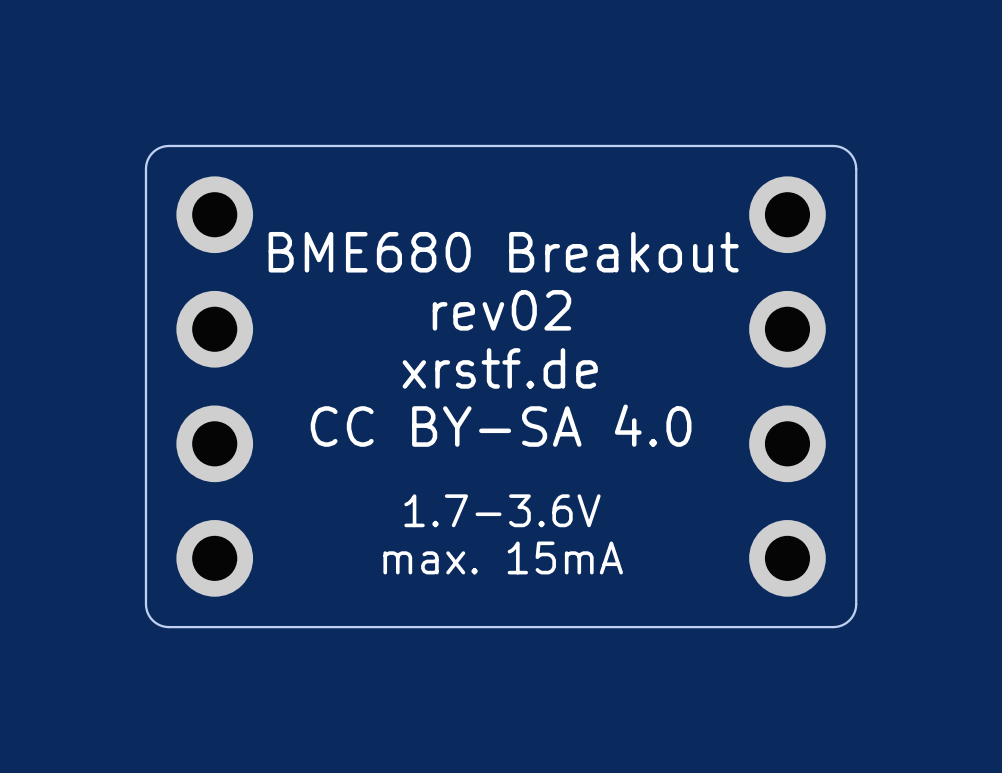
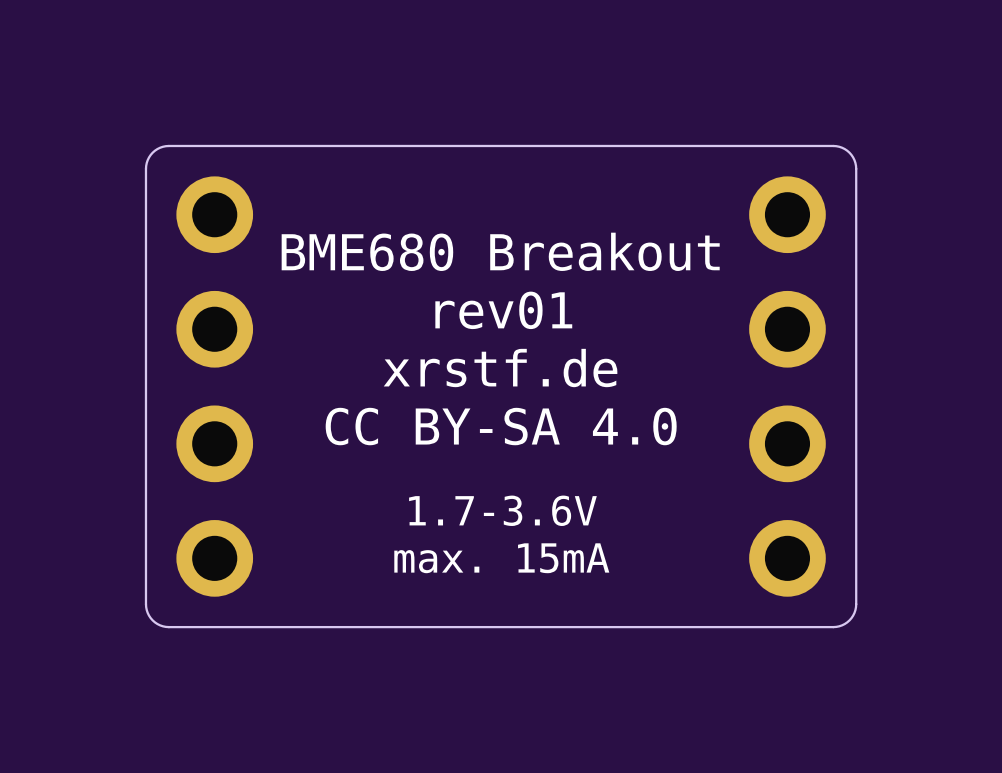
text: rev02 (501, 310) -> rev01 (503, 310)

